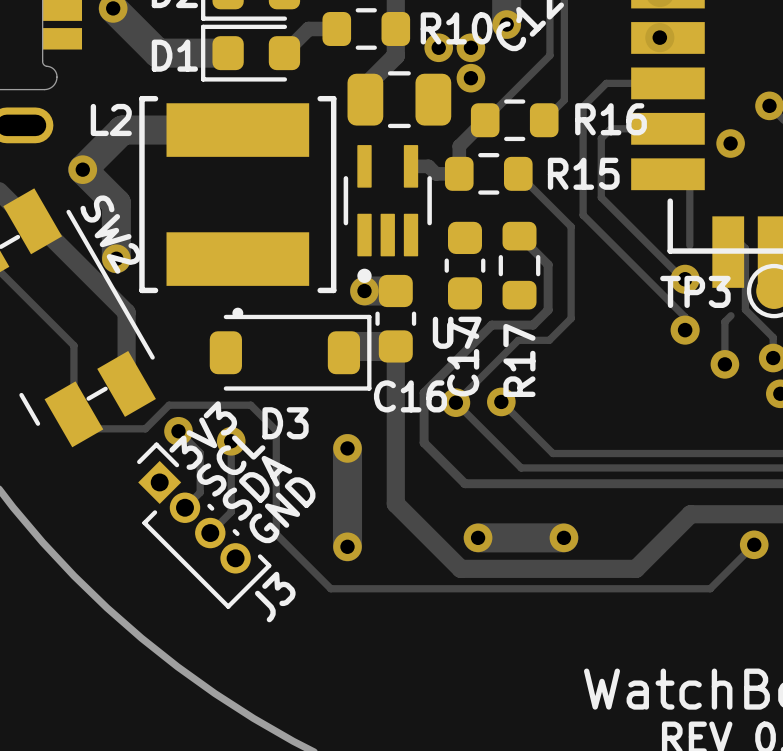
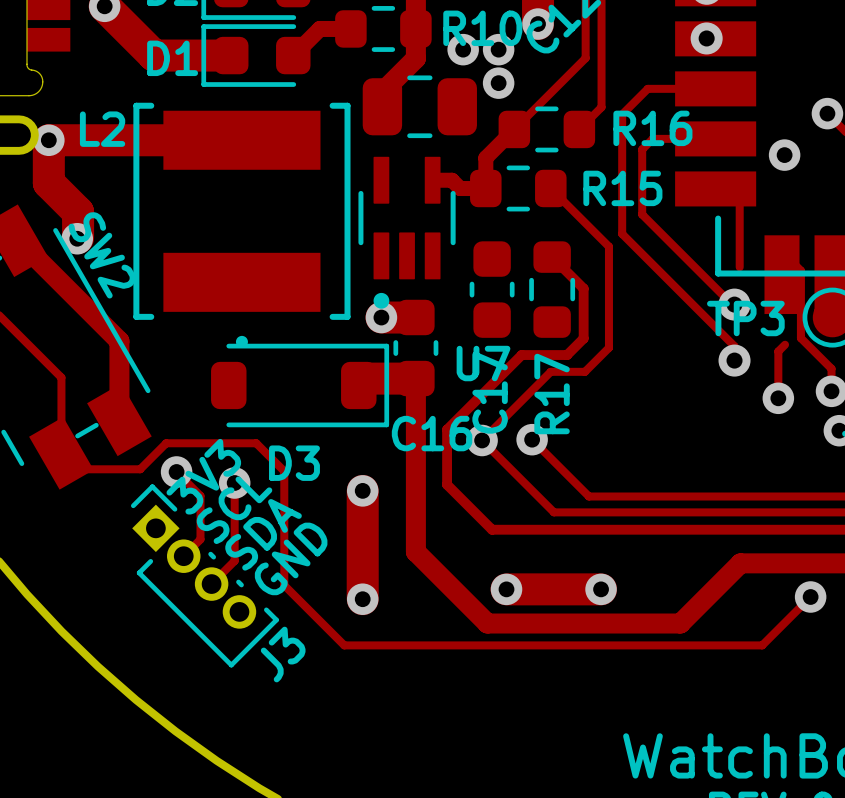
via: none -> (48, 140)
track: (122, 130) (82, 169) (116, 203) (116, 258) -> (114, 140) (48, 140) (48, 182) (78, 212) (77, 238)
via: (82, 169) -> none
via: none -> (77, 238)
via: (116, 258) -> none

